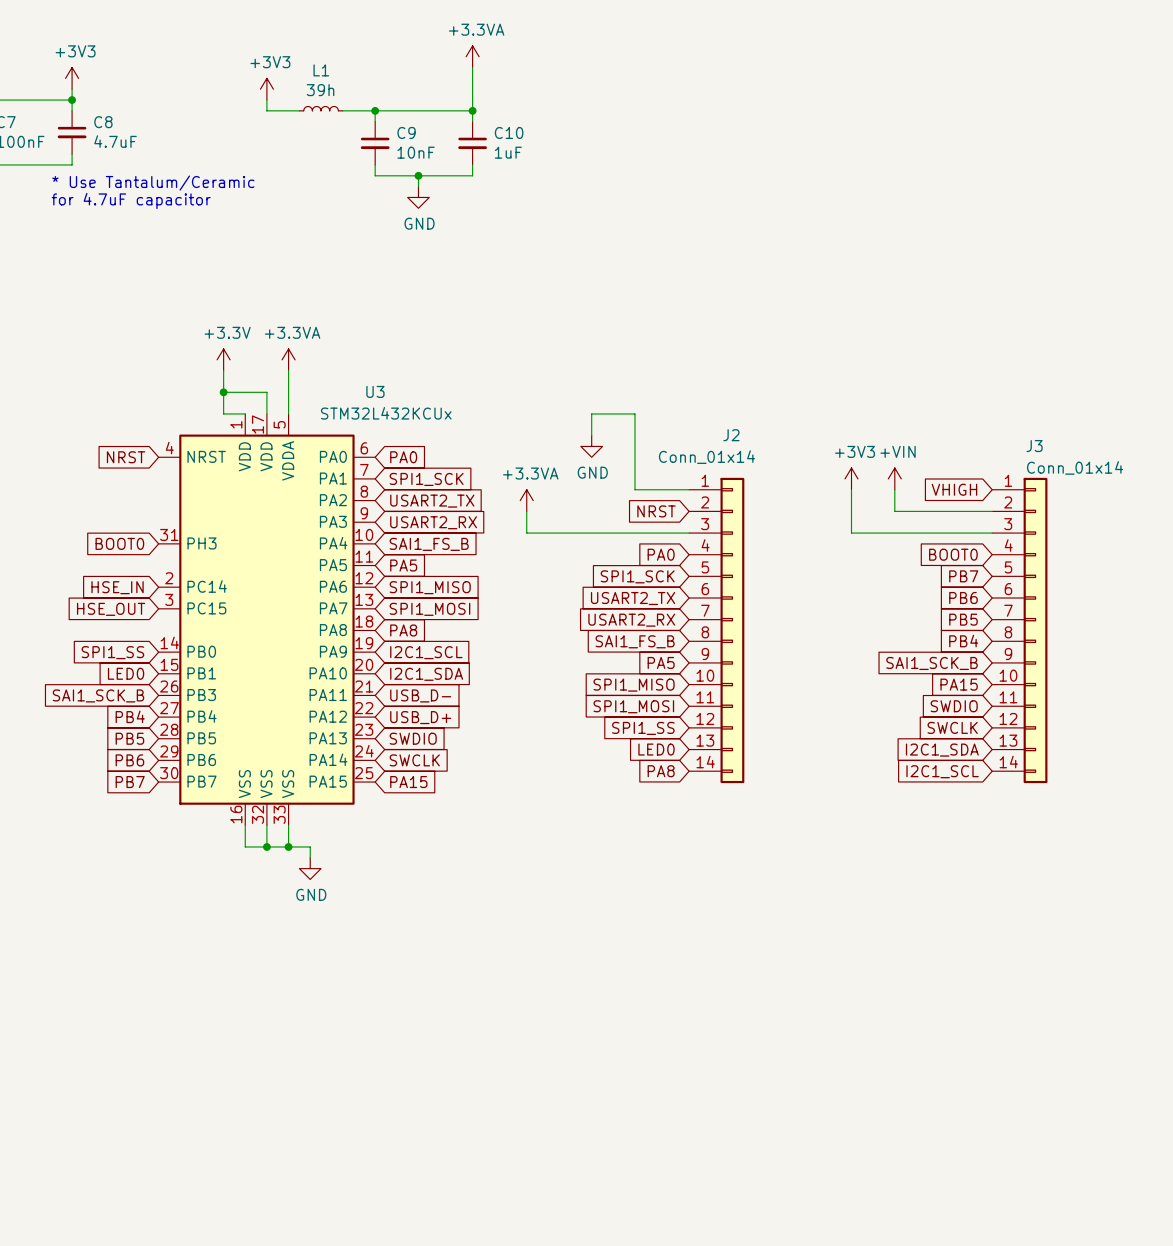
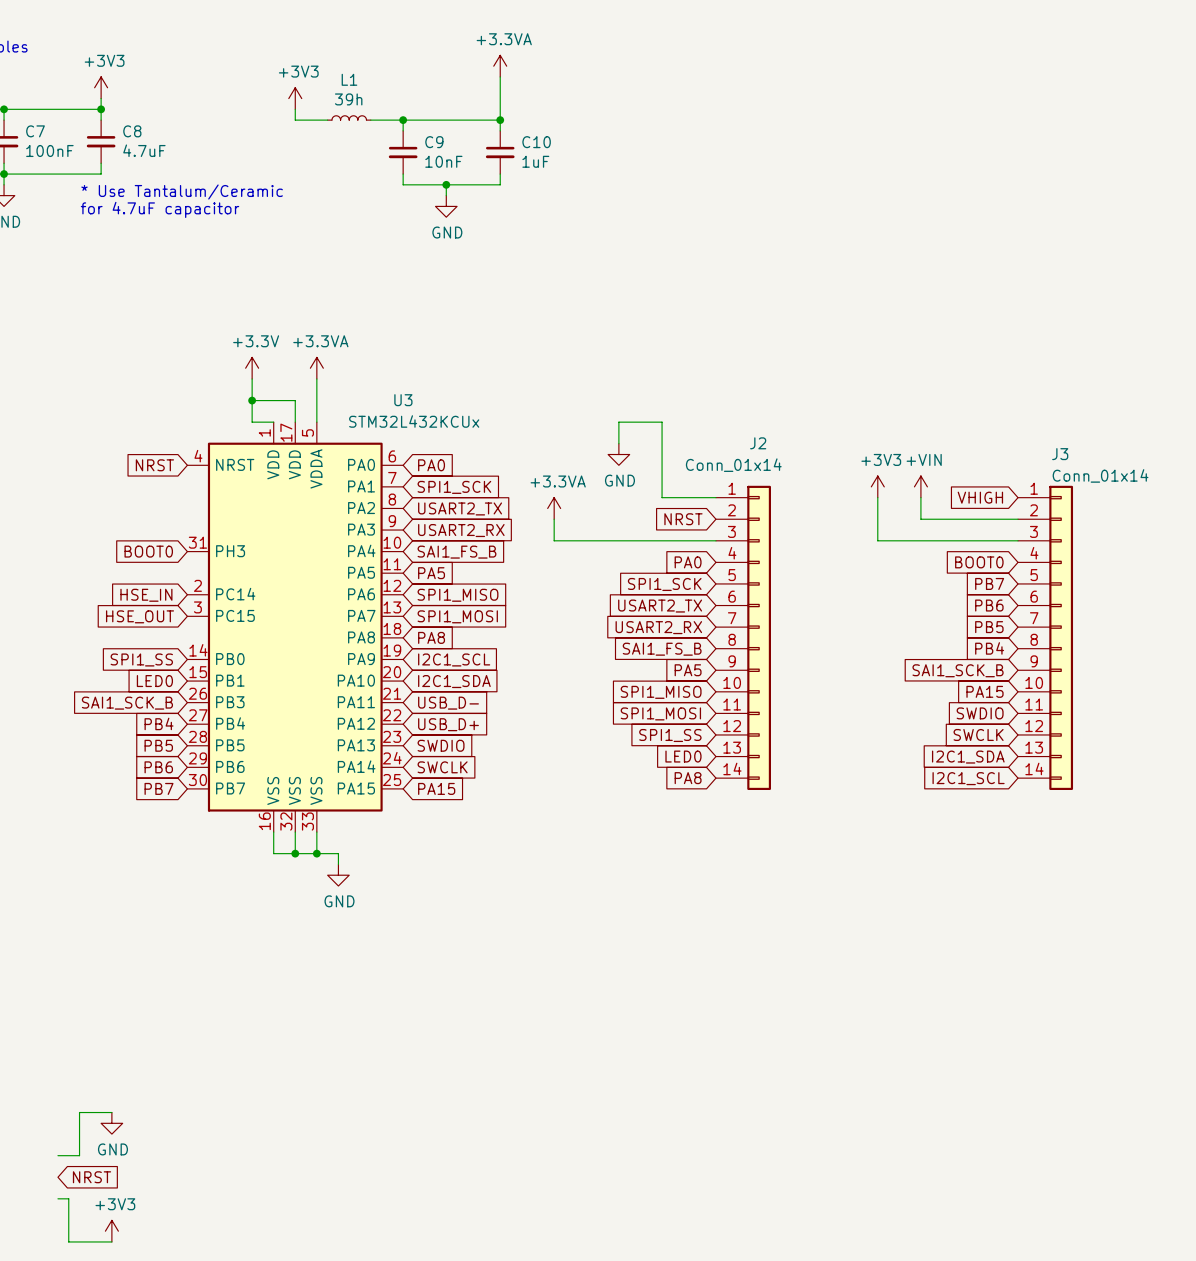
wire: none -> (111, 1112) (79, 1112) (79, 1155) (57, 1155)
power symbol: none -> GND (111, 1123)
global label: none -> NRST (92, 1177)
wire: none -> (57, 1198) (68, 1198) (68, 1241) (111, 1241)
power symbol: none -> +3V3 (111, 1231)

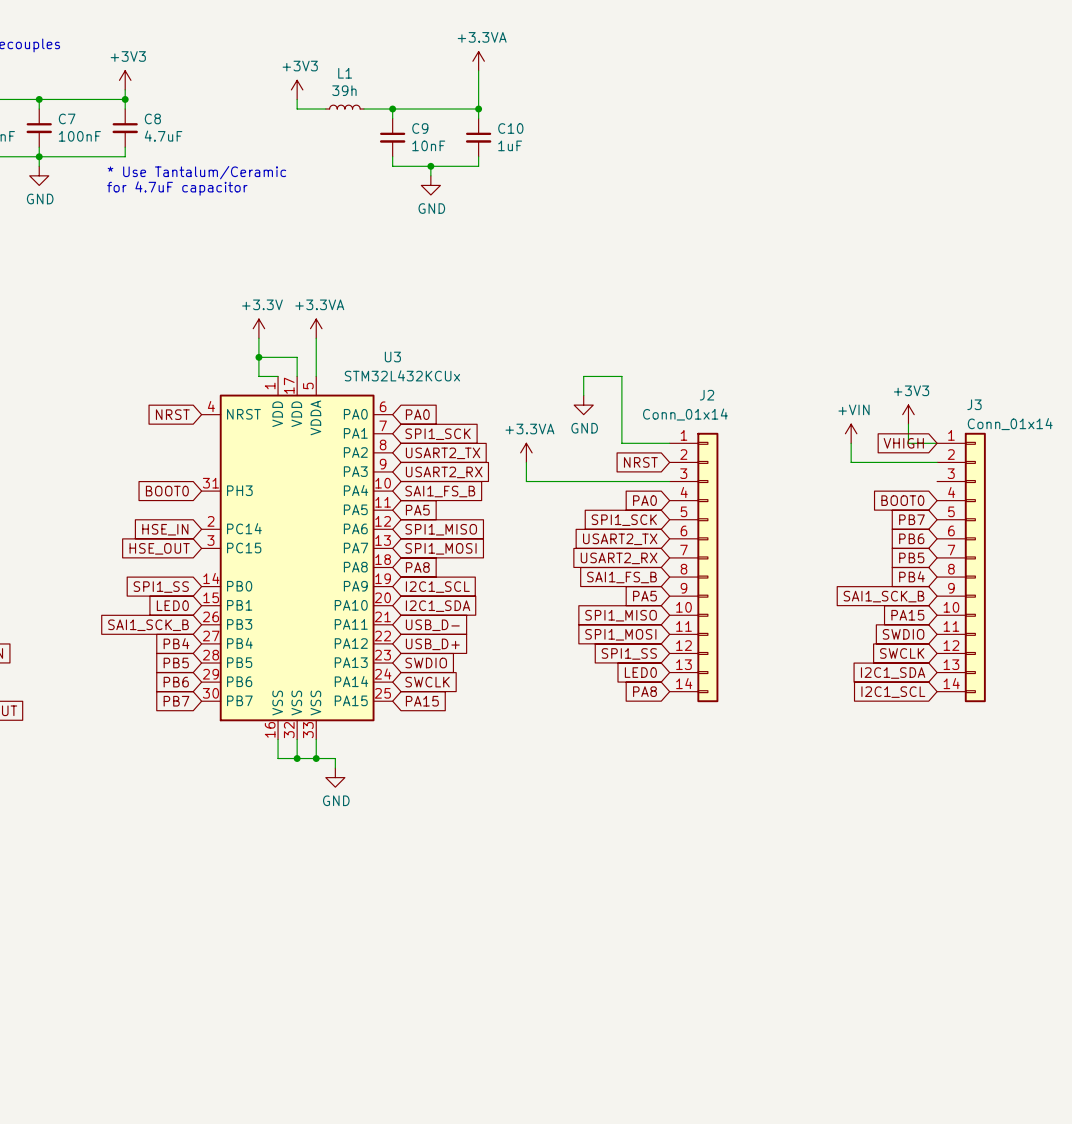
wire: none -> (908, 424) (908, 443) (937, 443)
power symbol position: +3V3 (877, 486) -> +3V3 (908, 414)
wire: (877, 497) (877, 540) (1018, 540) -> none
wire: (111, 1112) (79, 1112) (79, 1155) (57, 1155) -> none
power symbol: GND (111, 1123) -> none
global label: NRST (92, 1177) -> none
wire: (57, 1198) (68, 1198) (68, 1241) (111, 1241) -> none
power symbol: +3V3 (111, 1231) -> none

